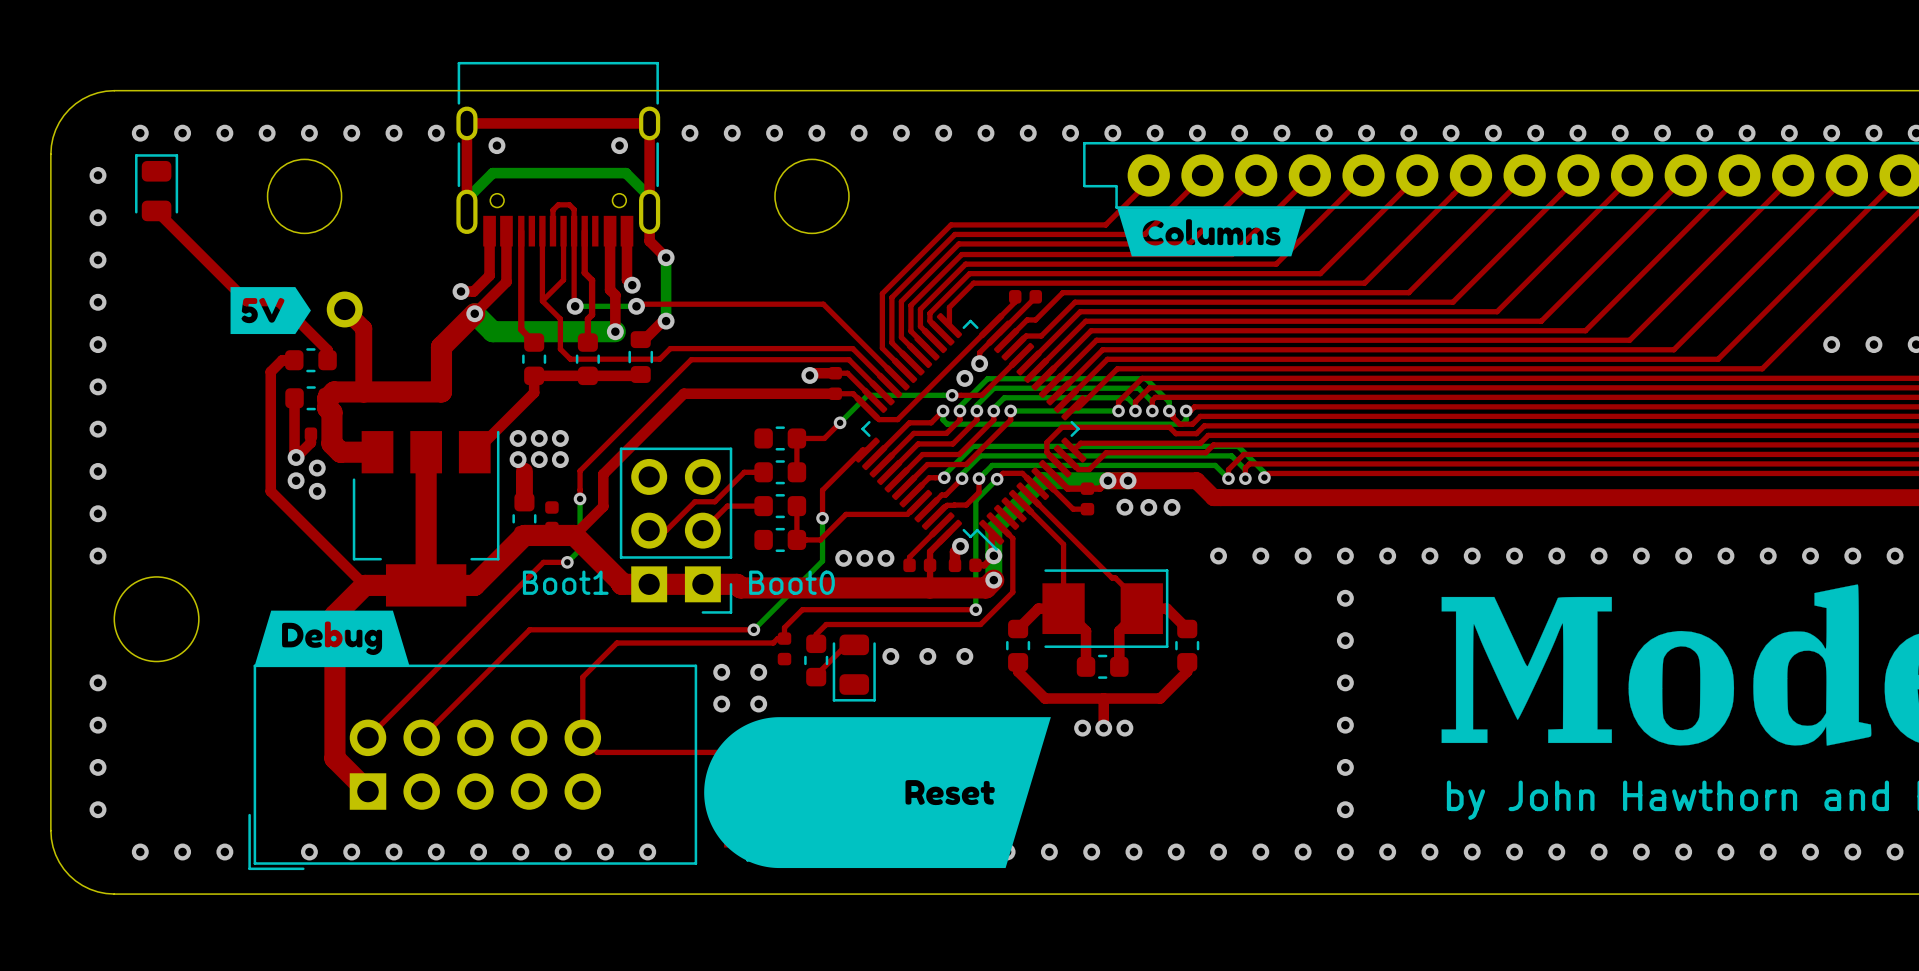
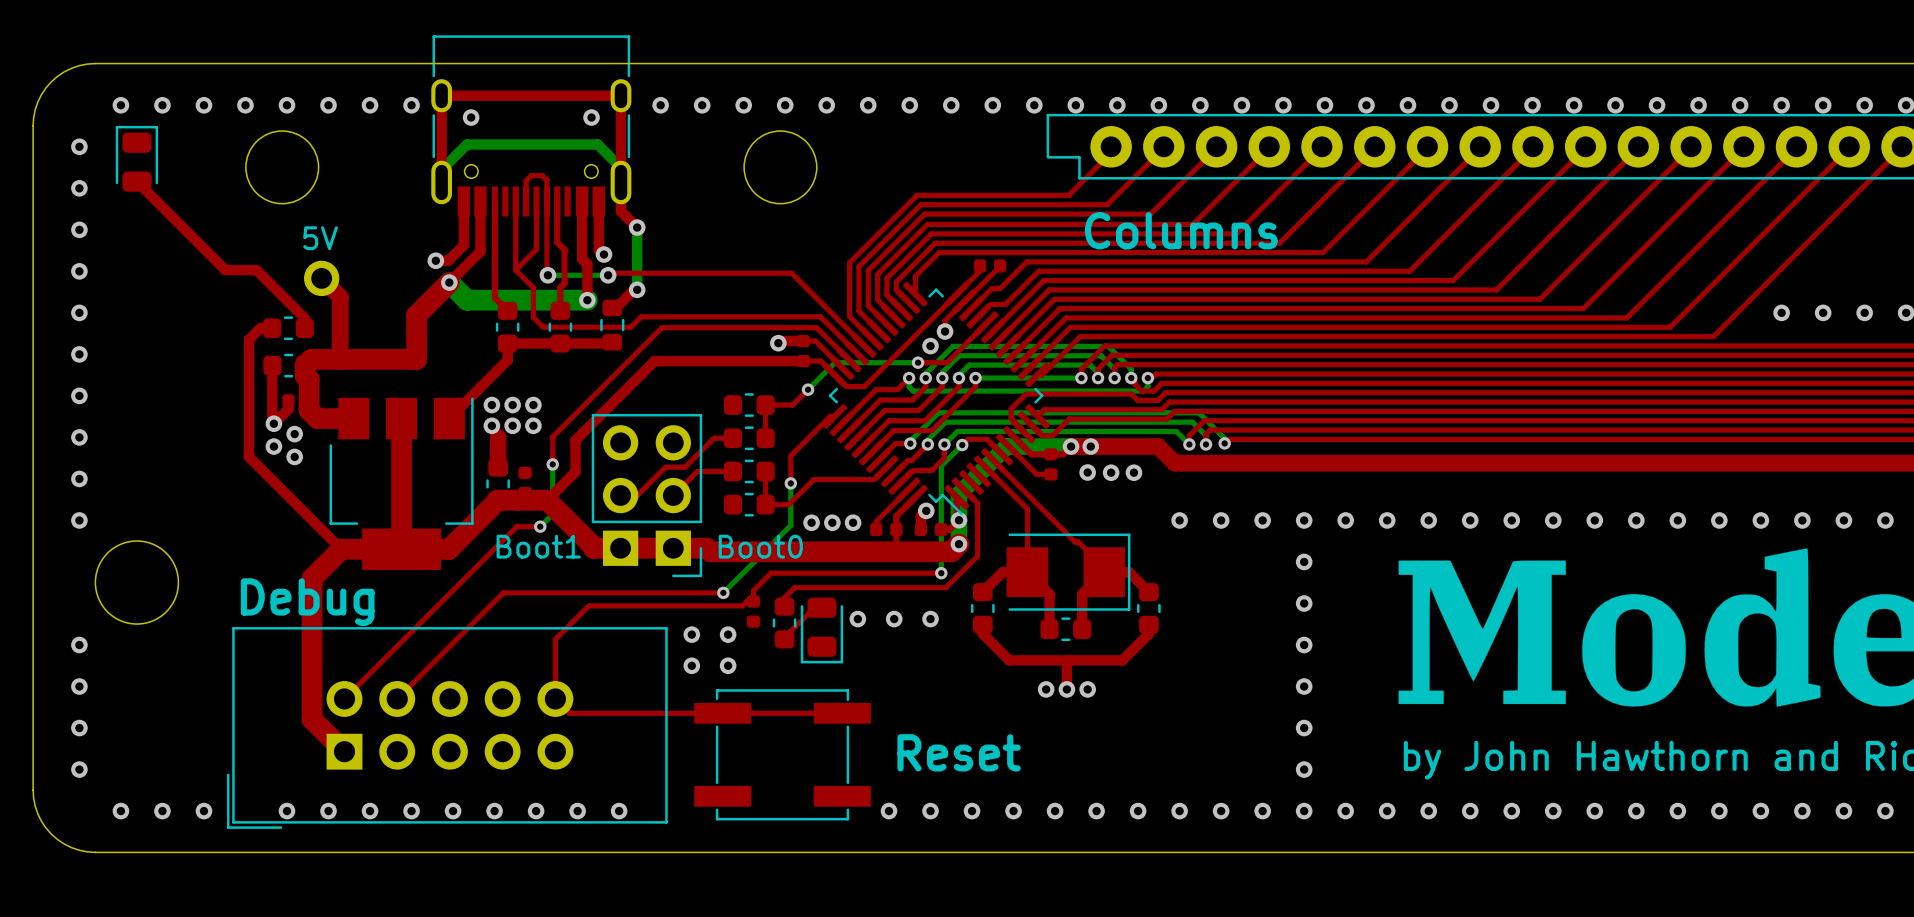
drawing: [1117, 208, 1306, 257] -> none
text: none -> Columns (1181, 230)
text: none -> 5V (320, 238)
drawing: [230, 287, 311, 335] -> none
drawing: [254, 610, 410, 666] -> none
text: none -> Debug (307, 602)
drawing: [704, 717, 1051, 869] -> none
text: none -> Reset (959, 752)

